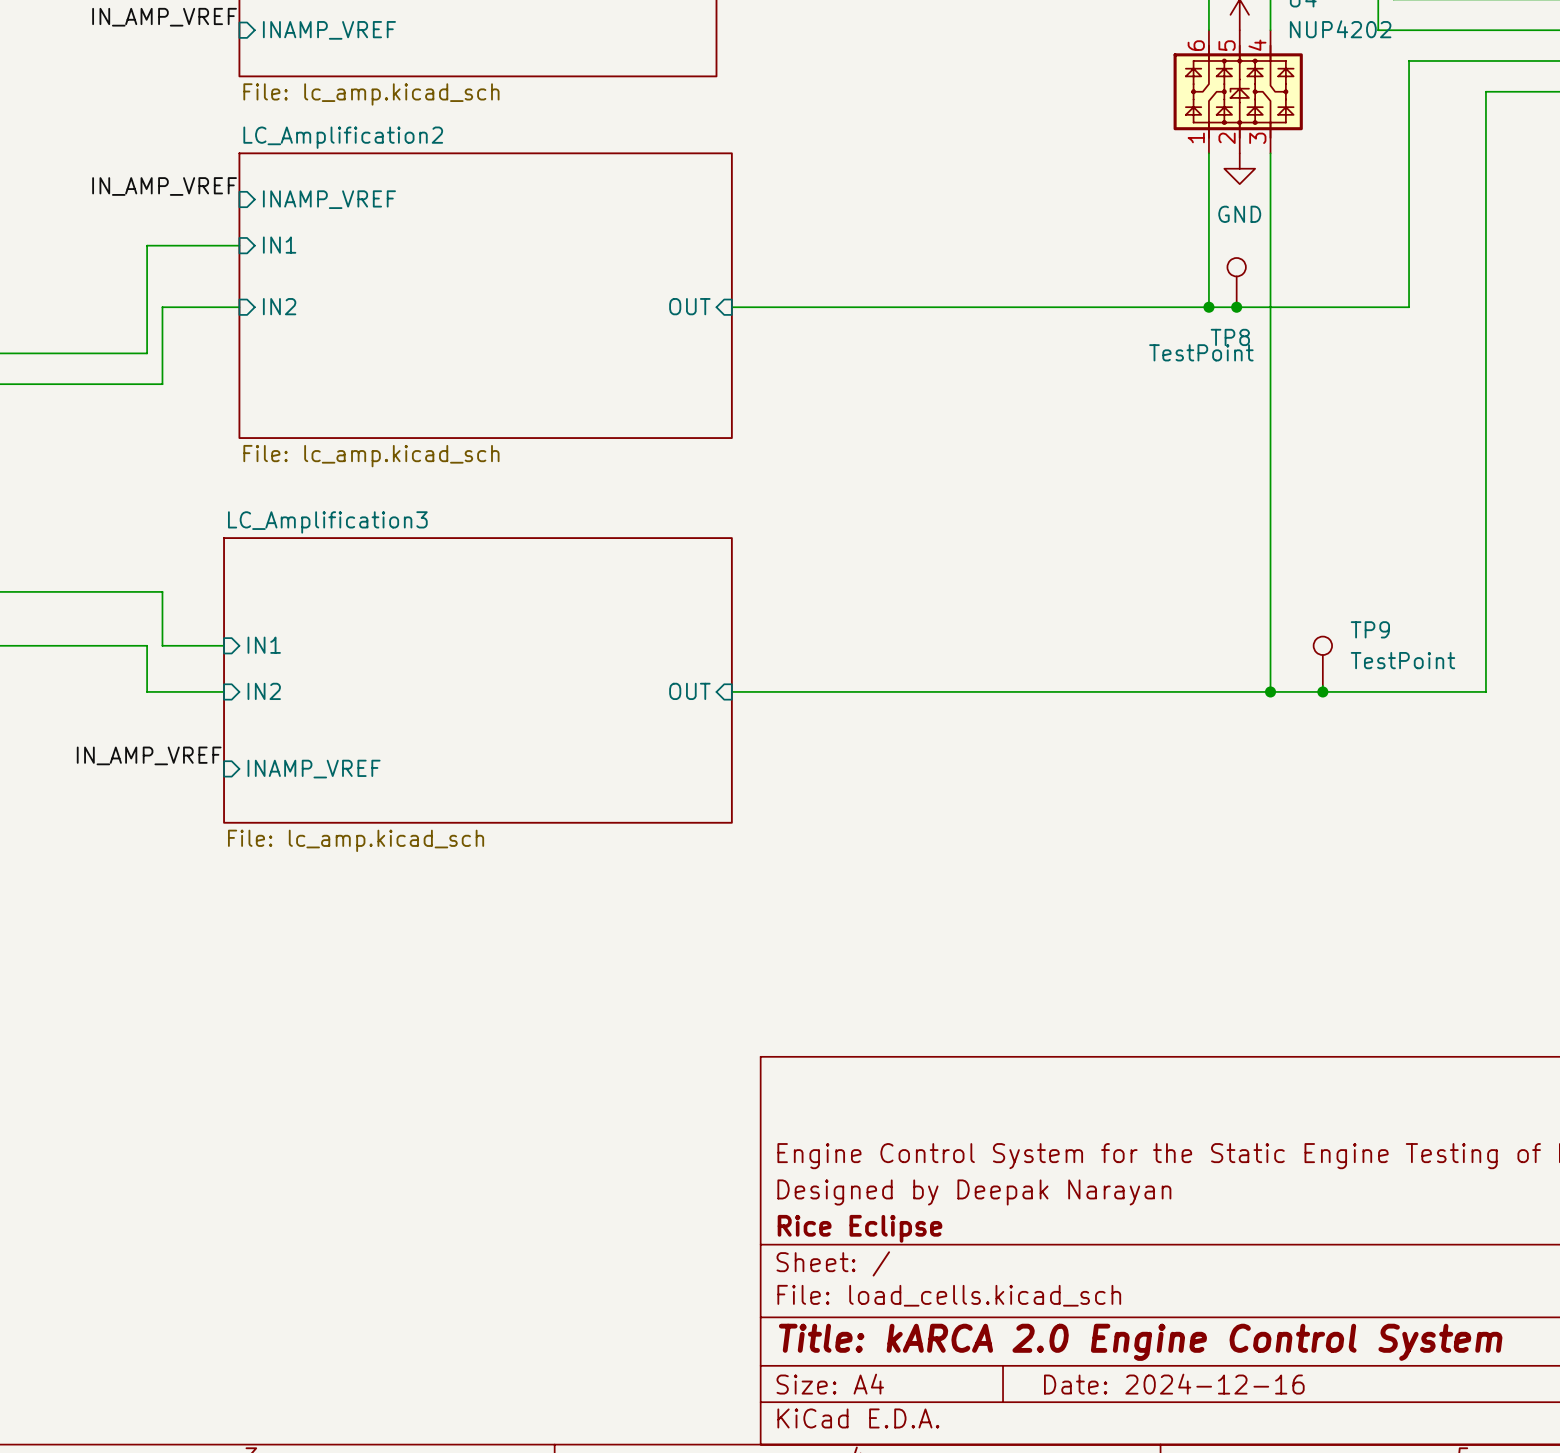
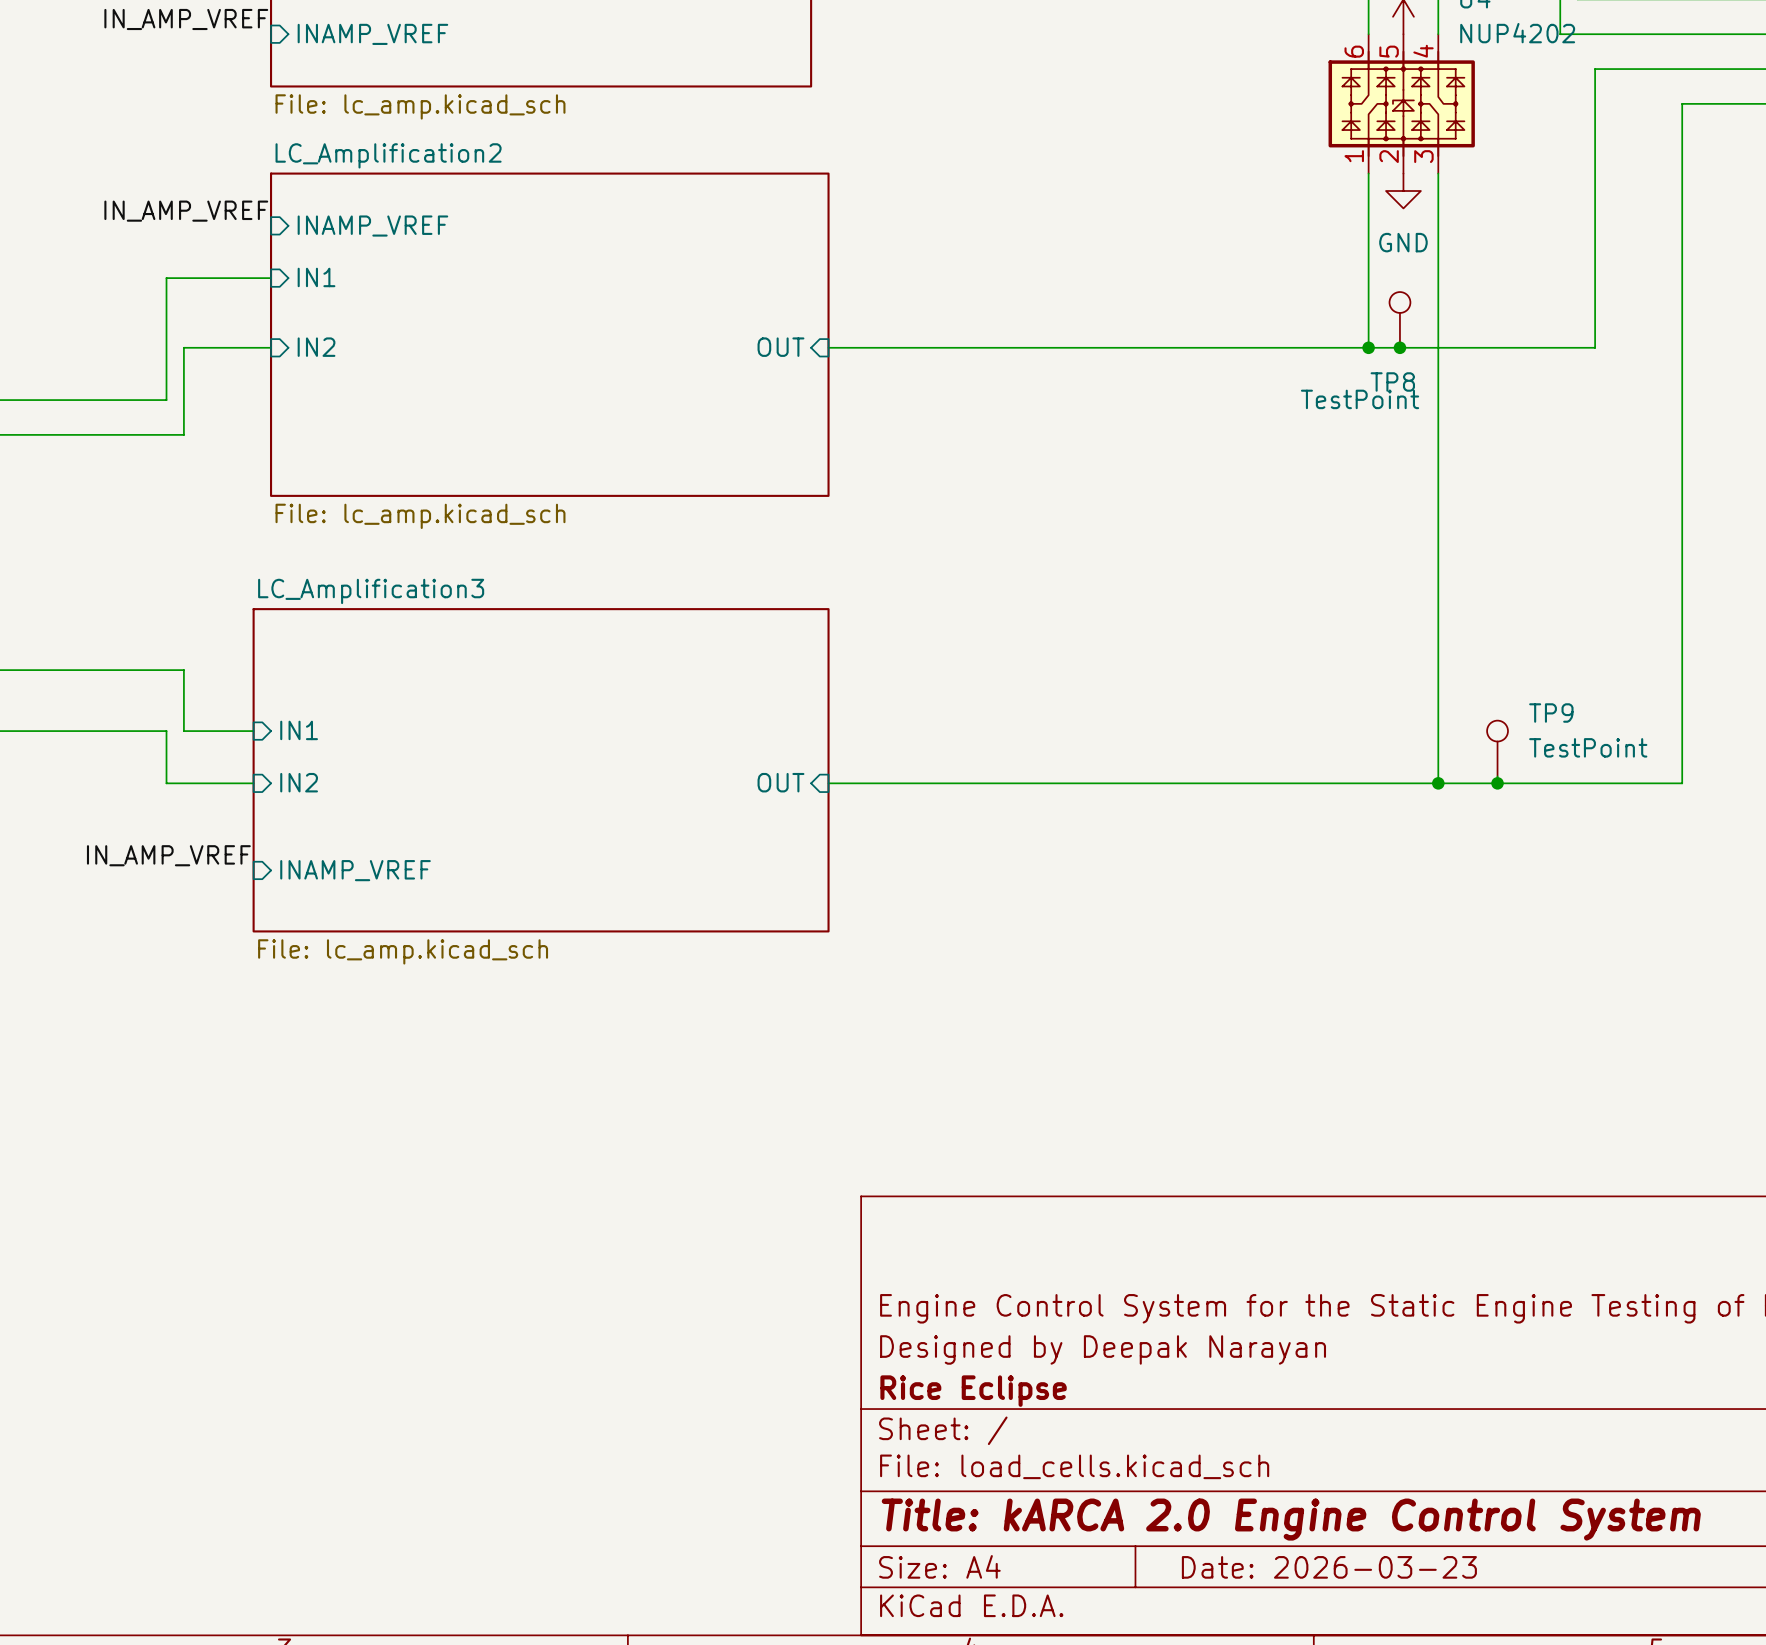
title block: Date: 2024-12-16 (1174, 1384) -> Date: 2026-03-23 (1329, 1567)

